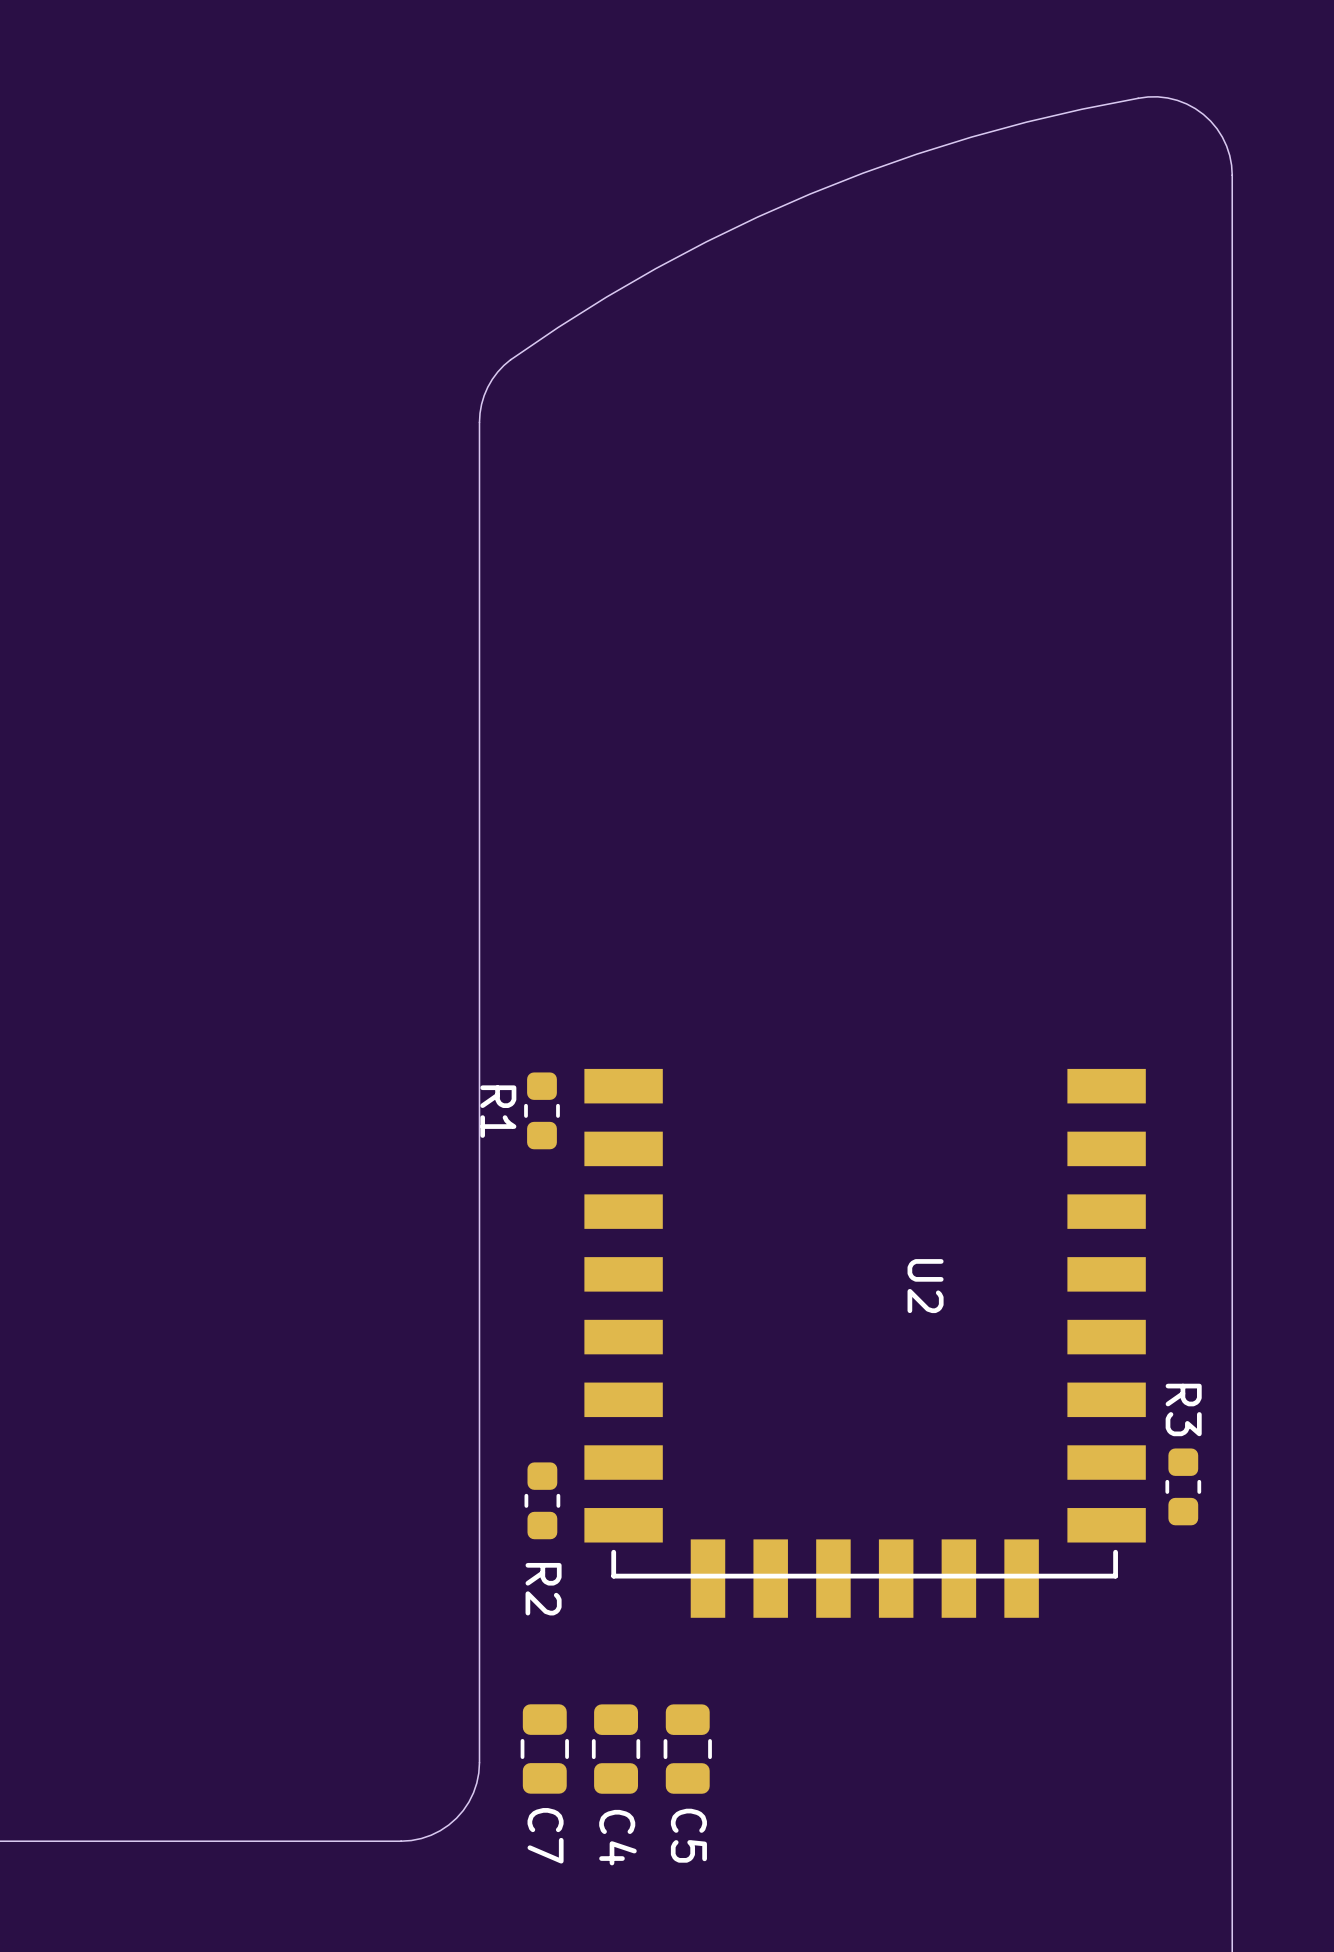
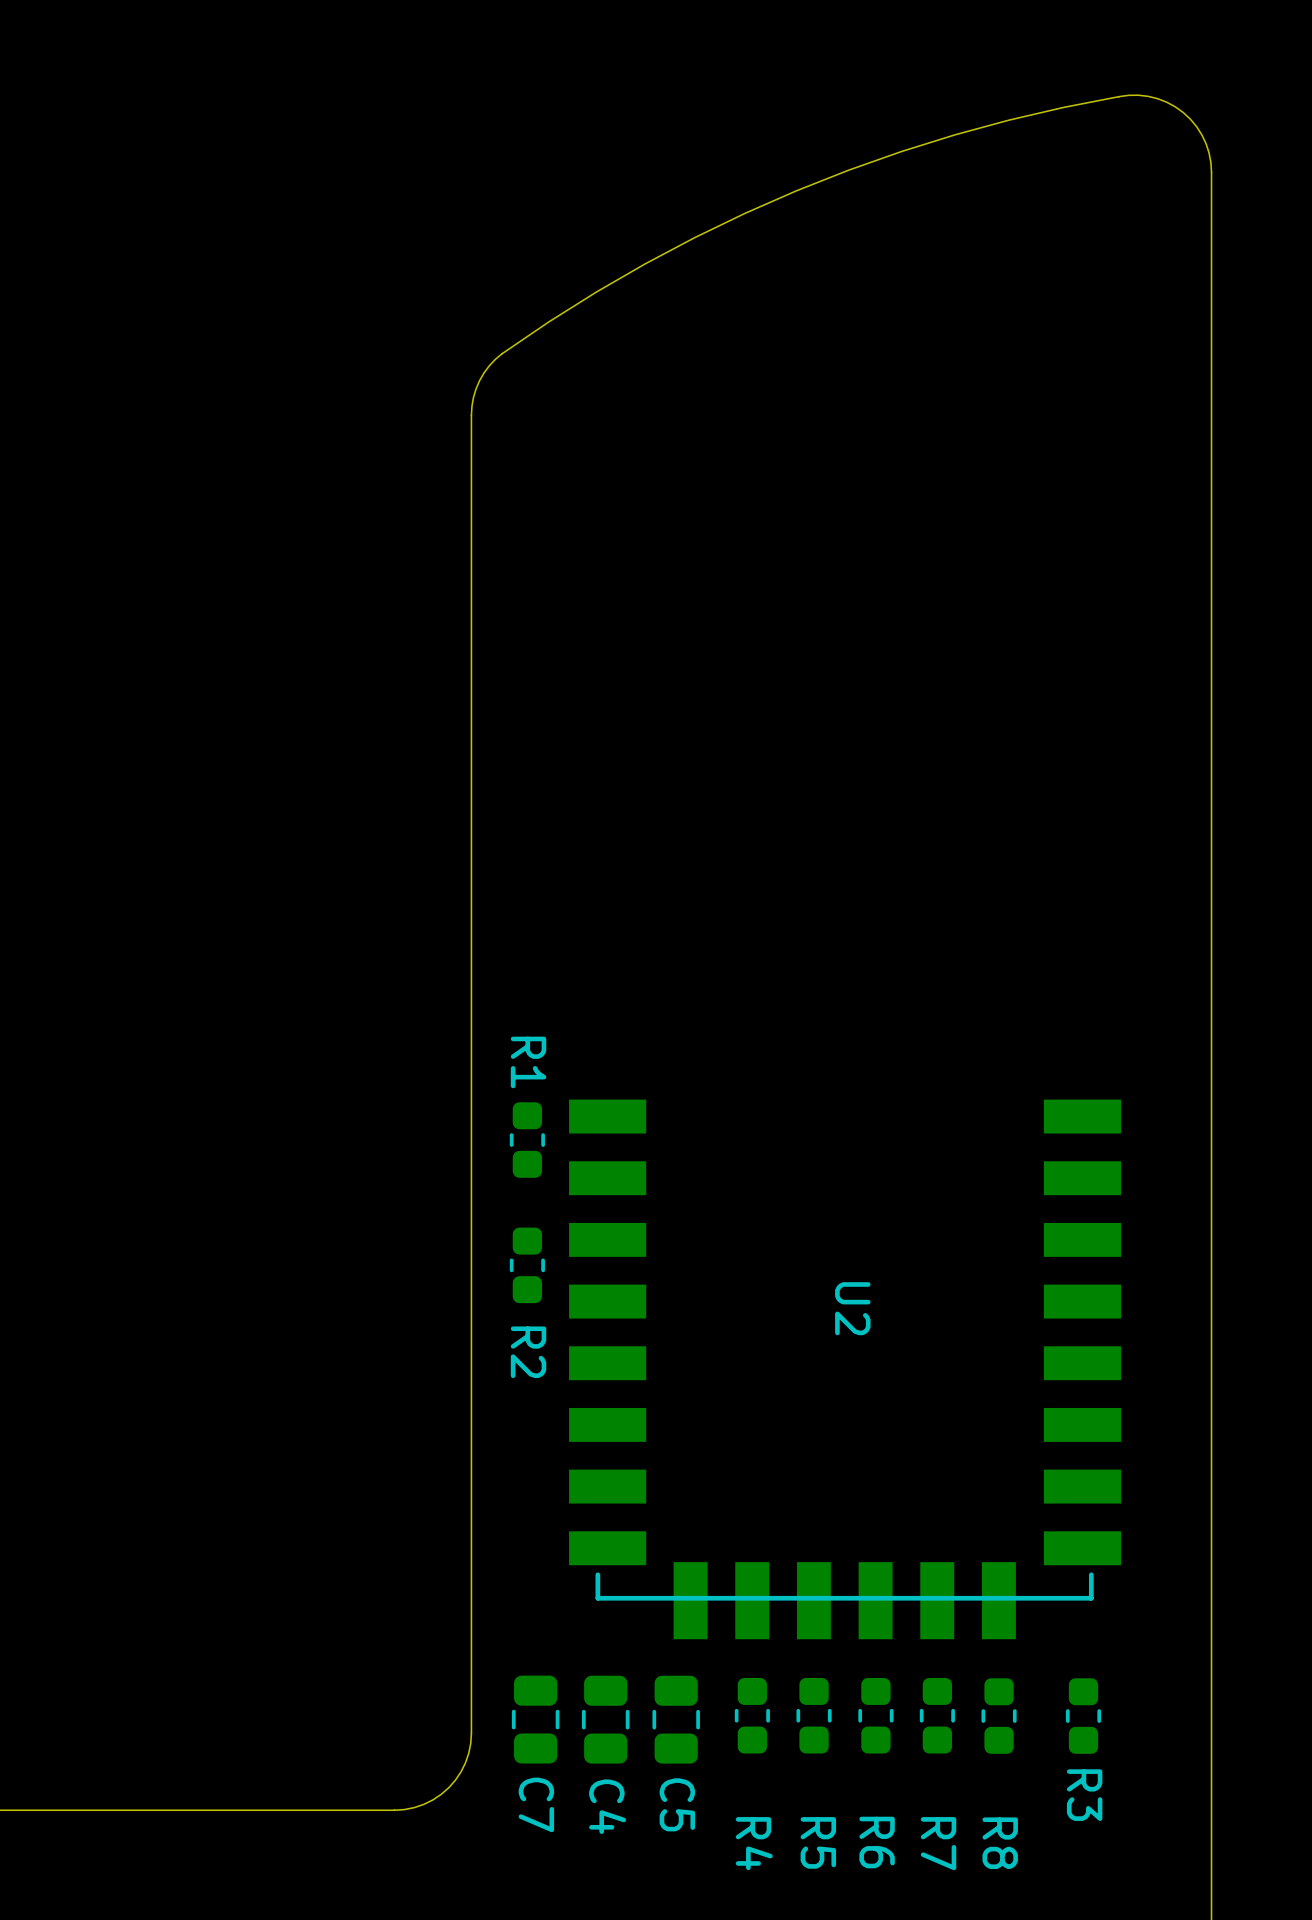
R1 position: (541, 1110) -> (527, 1140)
R1 name position: R1 (498, 1111) -> R1 (528, 1062)
U2 name position: U2 (925, 1286) -> U2 (852, 1308)
U2 position: (865, 1343) -> (845, 1369)
R3 name position: R3 (1183, 1409) -> R3 (1084, 1795)
R3 position: (1183, 1486) -> (1083, 1716)
R2 position: (542, 1500) -> (527, 1265)
R4: none -> (752, 1715)
R5: none -> (814, 1715)
R6: none -> (875, 1715)
R7: none -> (937, 1715)
R8: none -> (999, 1716)

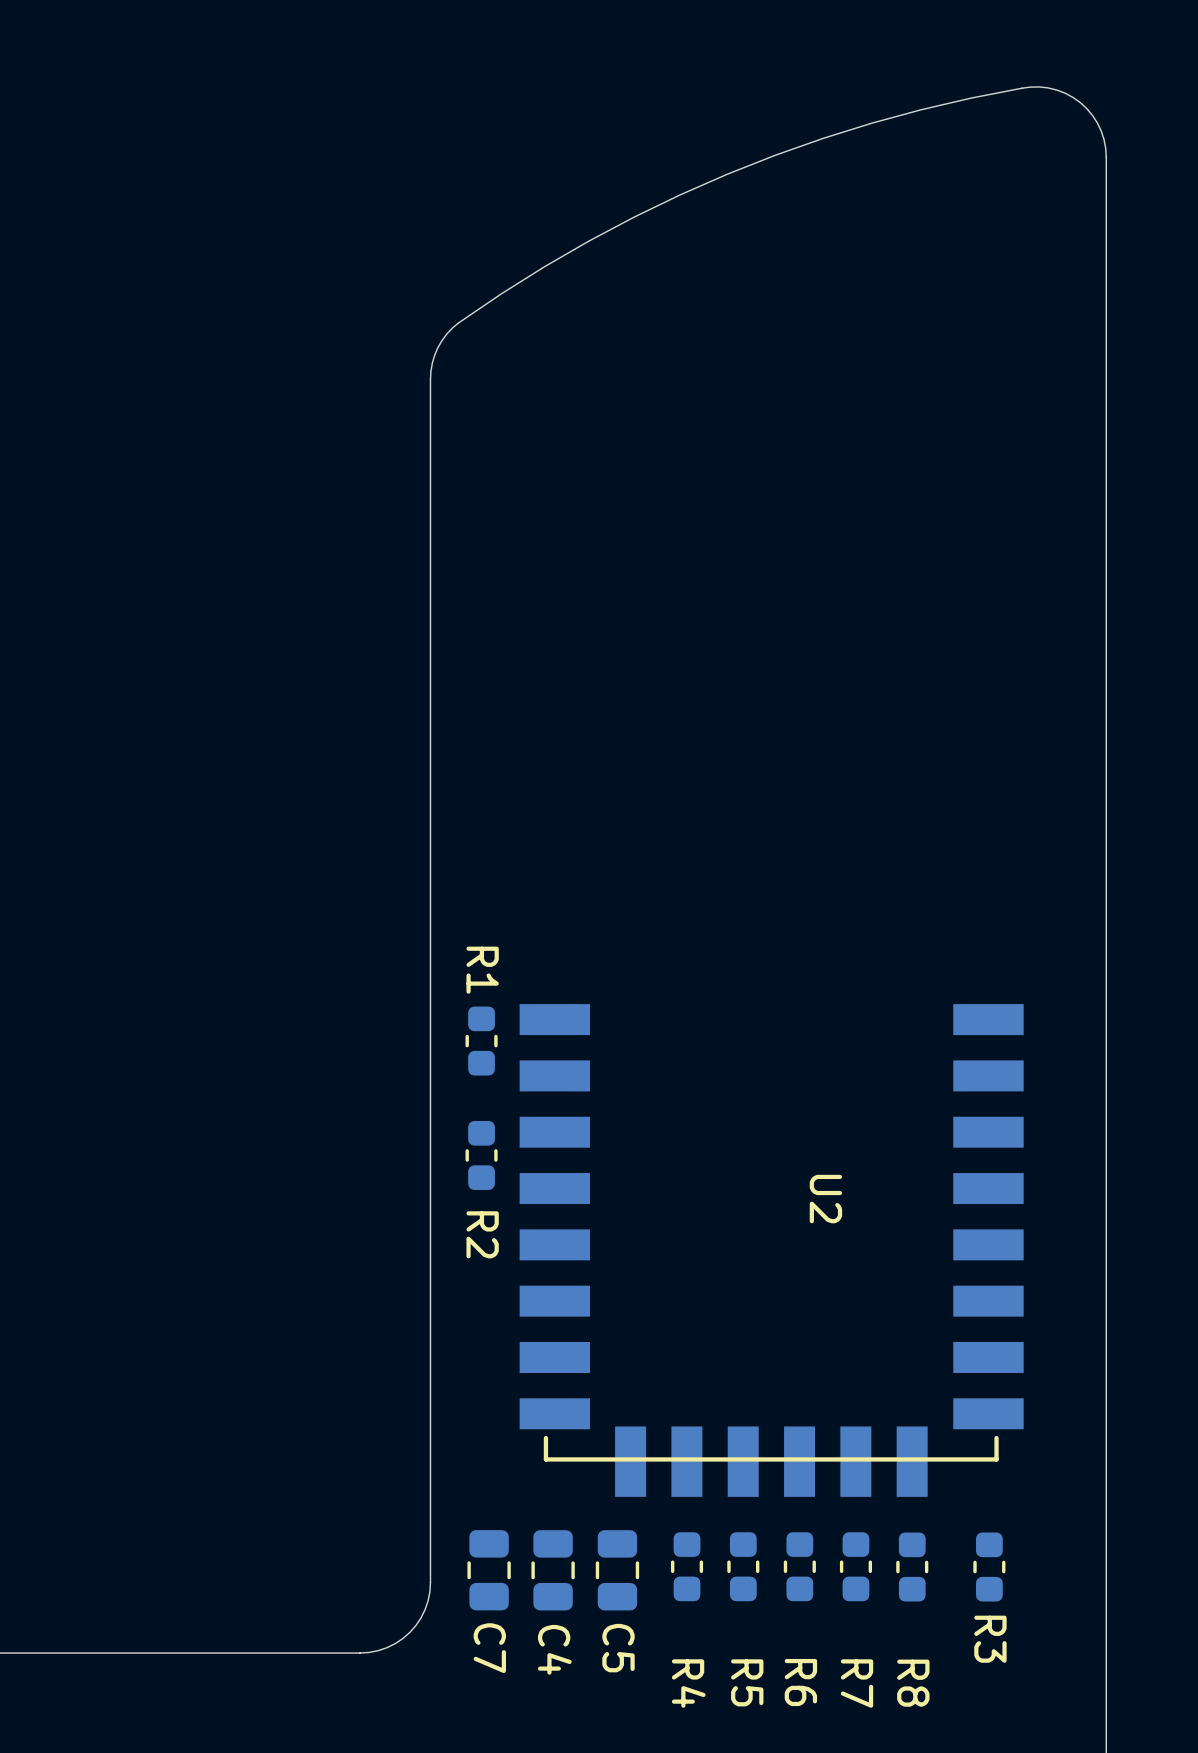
U2 name position: U2 (852, 1308) -> U2 (825, 1199)

